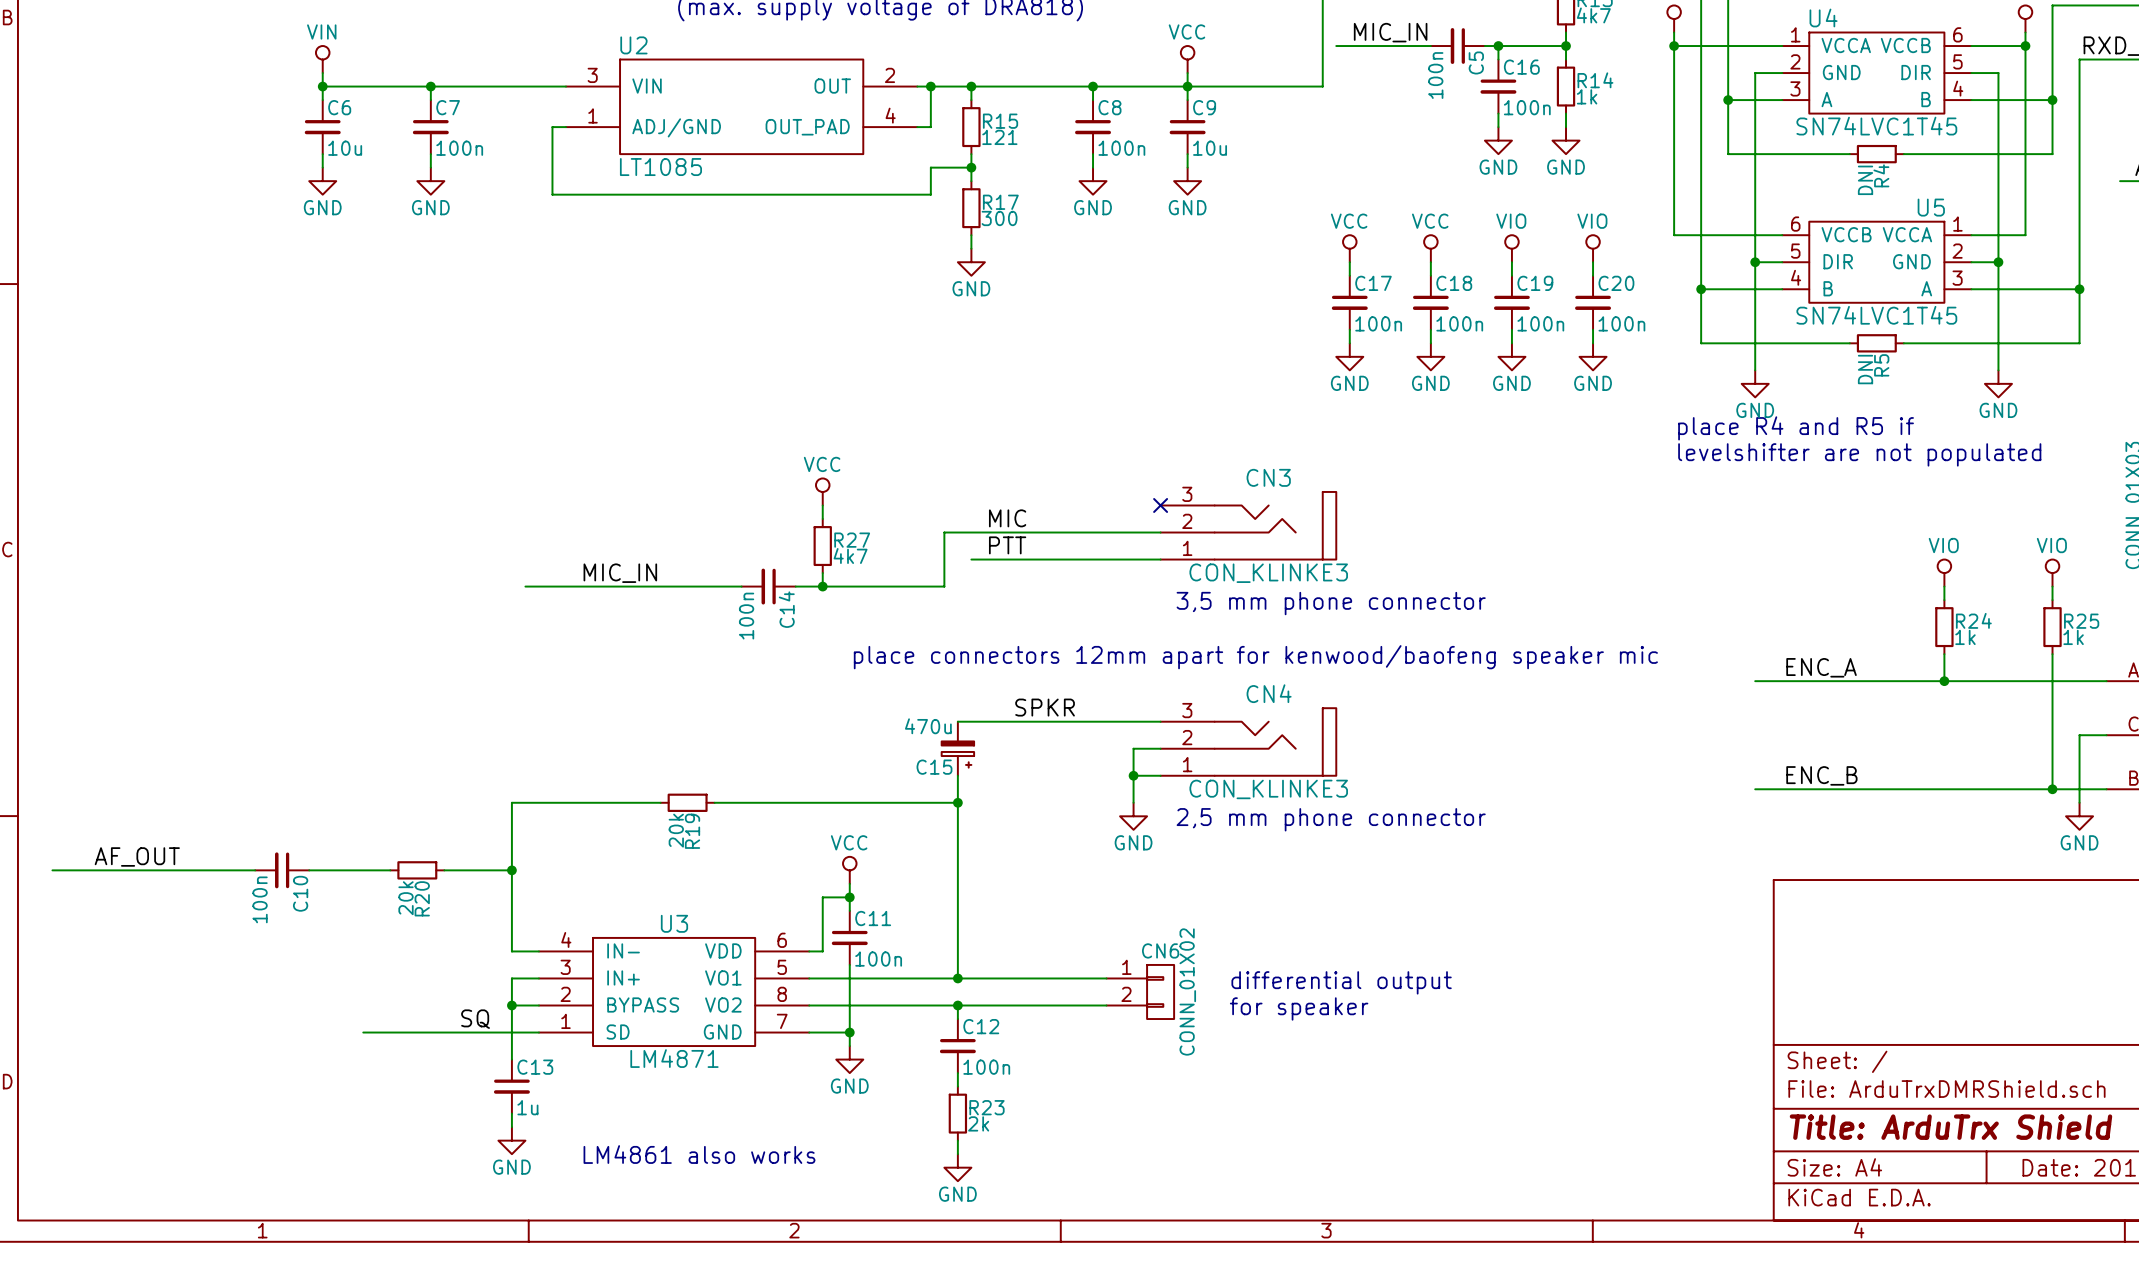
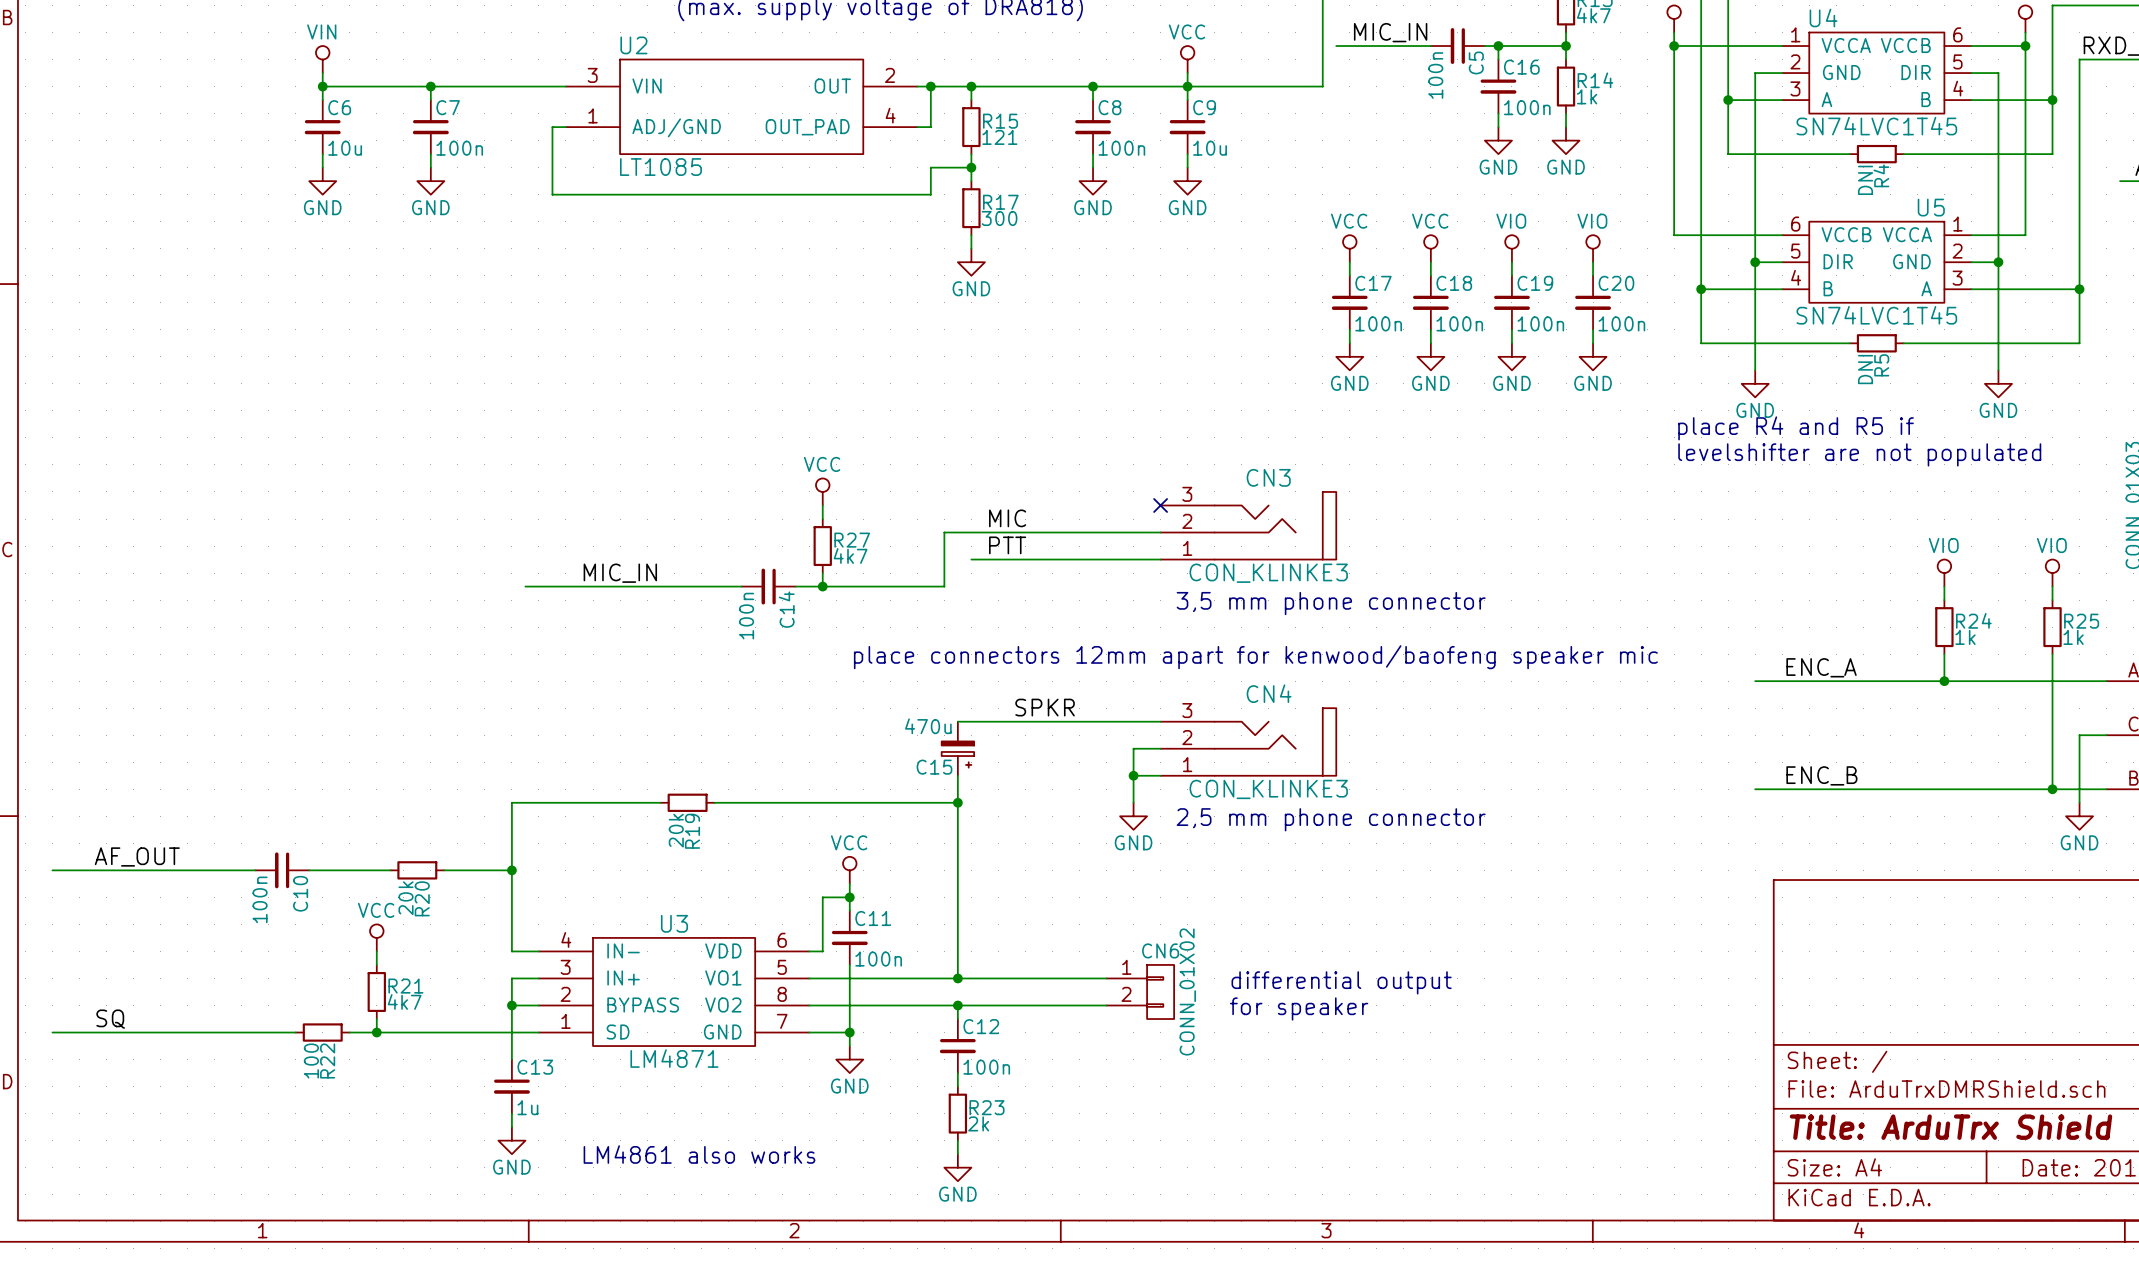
power symbol: none -> VCC (376, 937)
wire: none -> (376, 951) (376, 964)
R21: none -> 4k7 (376, 991)
label: none -> SQ (110, 1019)
wire: none -> (376, 1019) (376, 1032)
label: SQ (475, 1019) -> none
wire: none -> (52, 1032) (295, 1032)
R22: none -> 100 (322, 1032)
wire: none -> (349, 1032) (363, 1032)
junction: none -> (376, 1032)

